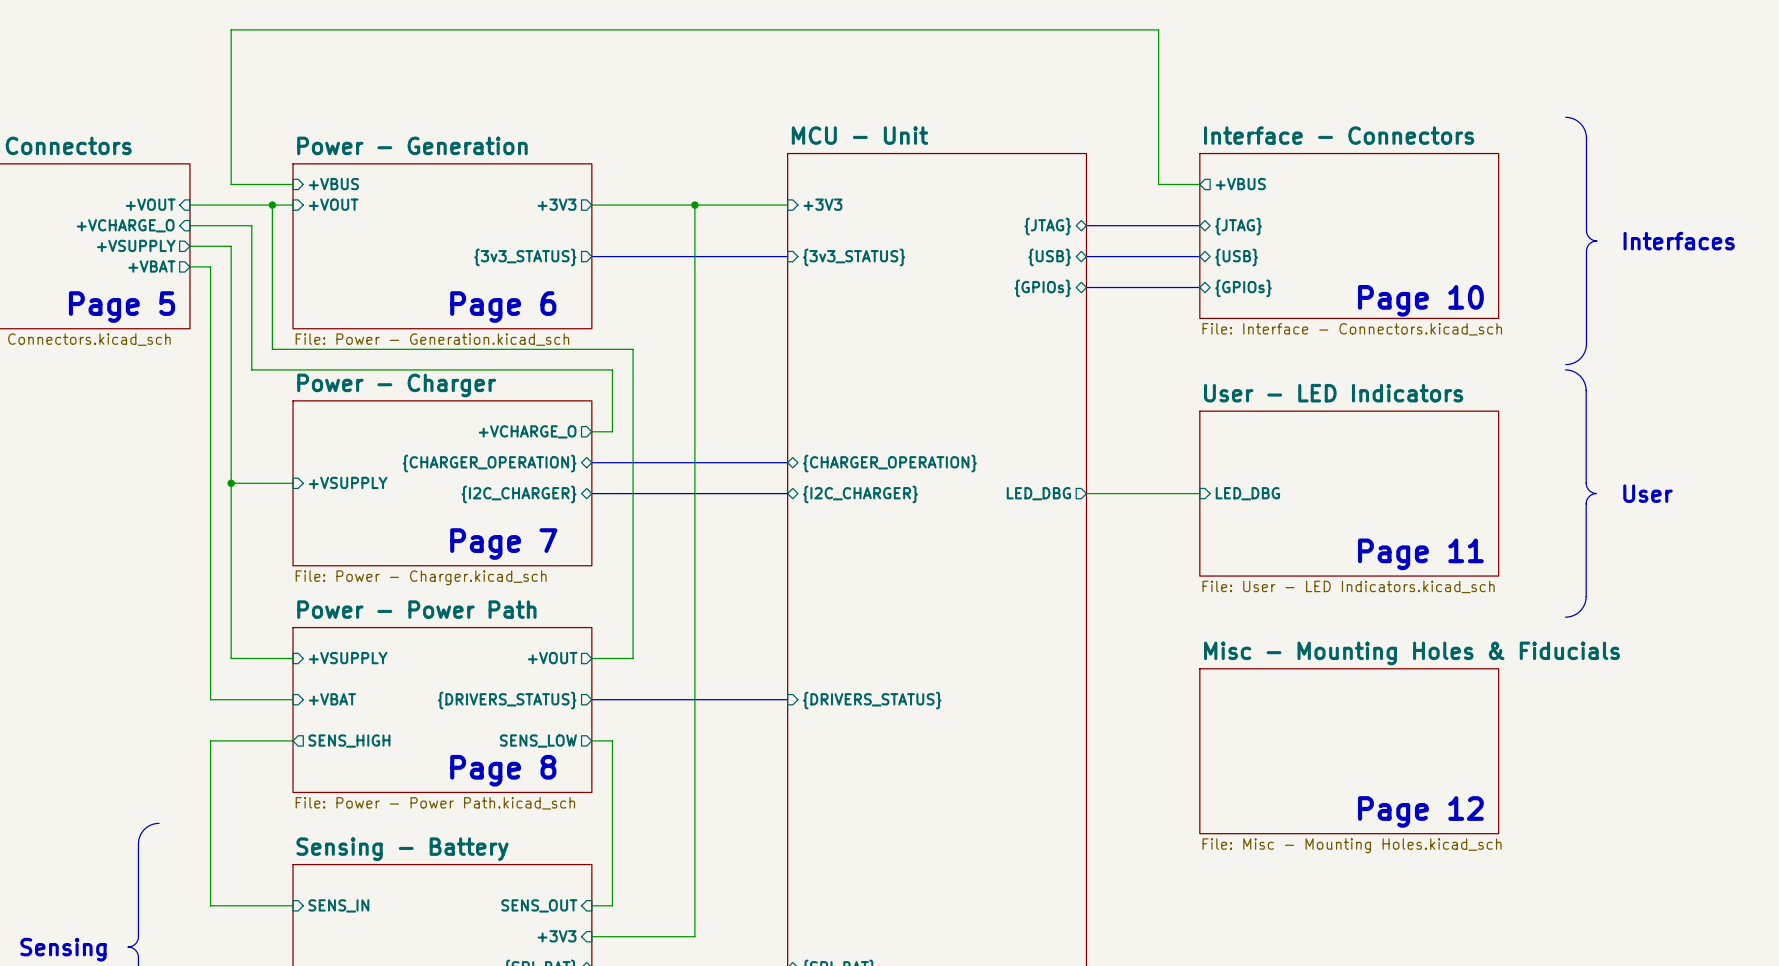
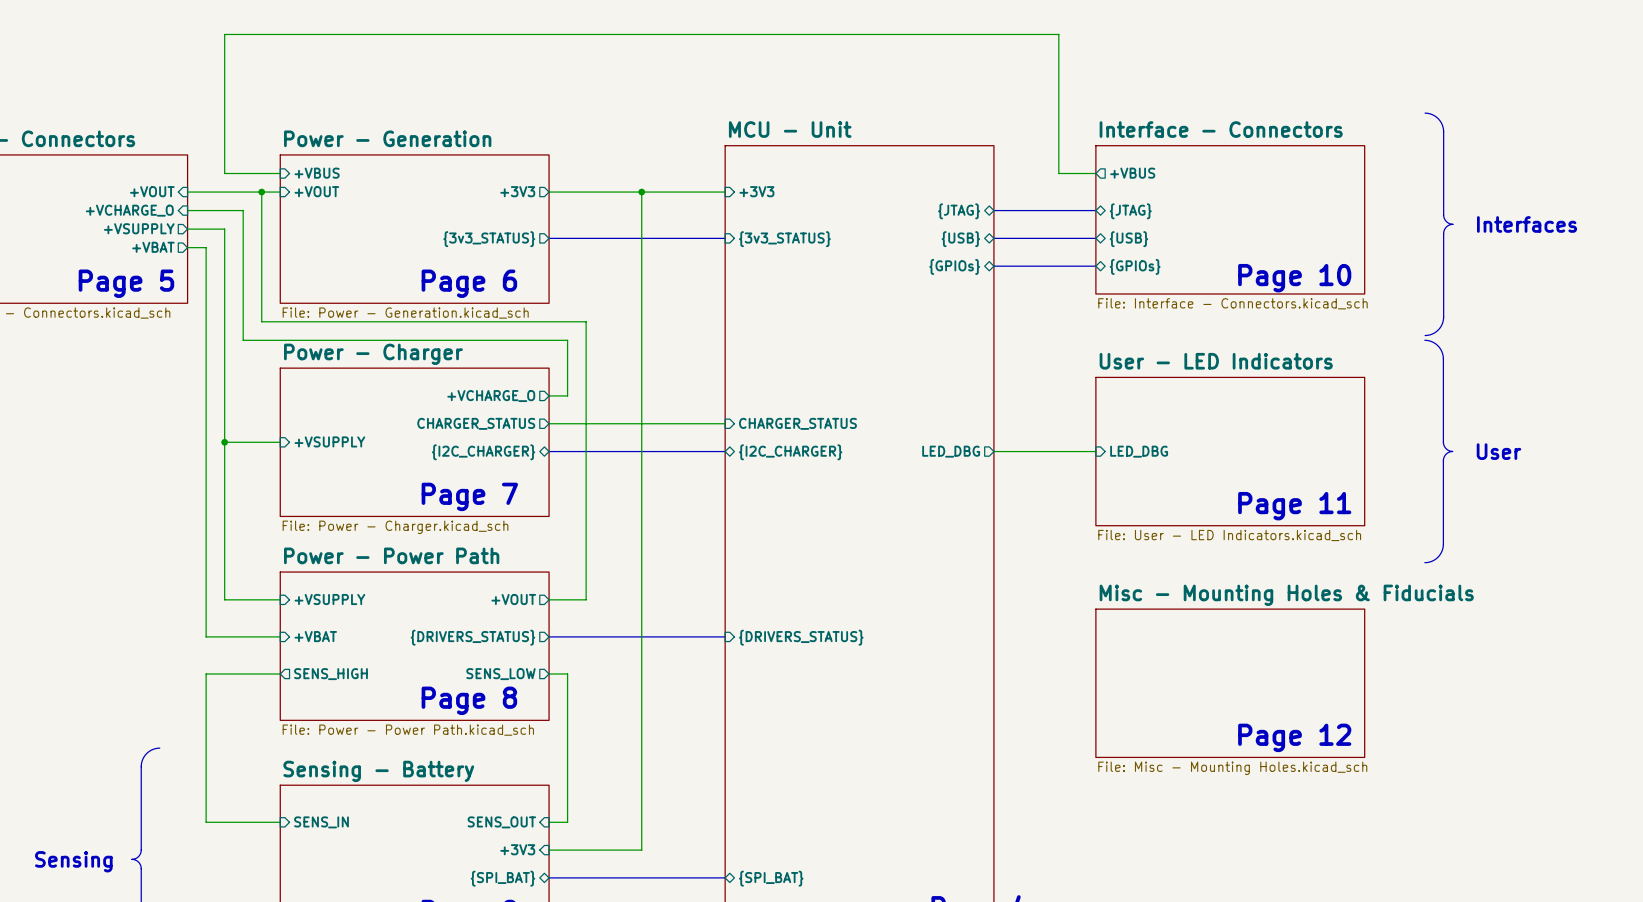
bus: (591, 462) (787, 462) -> none
sheet pin shape: bidirectional (489, 463) -> output (476, 423)
sheet pin: {CHARGER_OPERATION} (489, 463) -> CHARGER_STATUS (476, 423)
sheet pin shape: bidirectional (889, 463) -> input (797, 423)
sheet pin: {CHARGER_OPERATION} (889, 463) -> CHARGER_STATUS (797, 423)

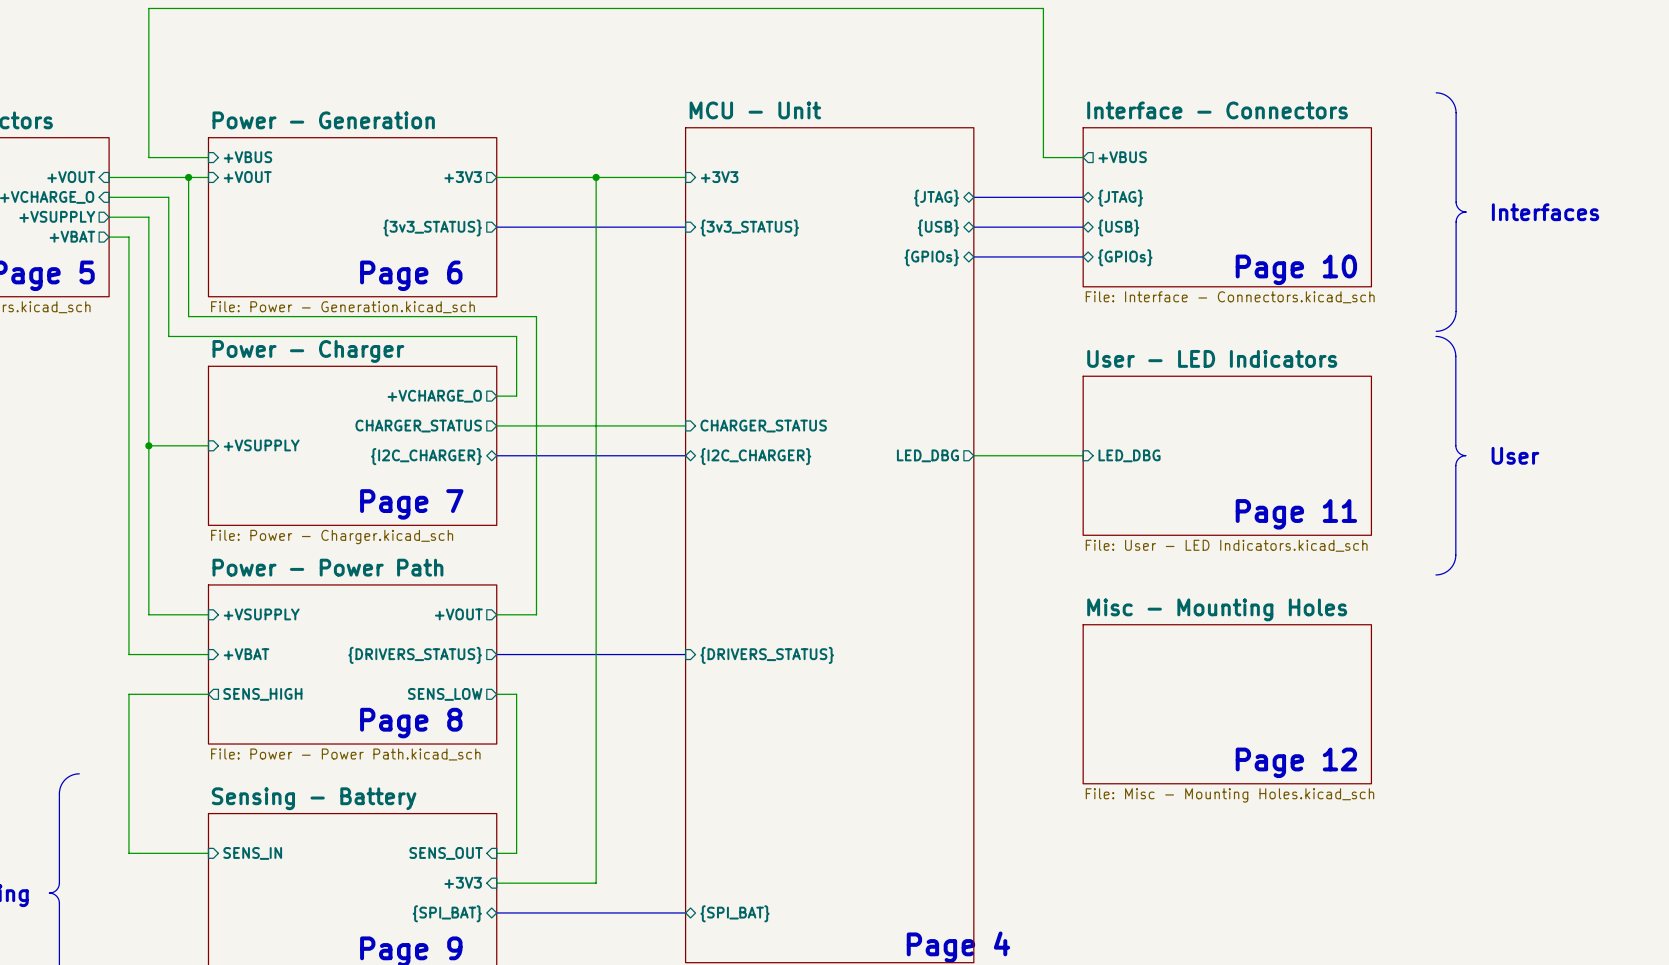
sheet Misc - Mounting Holes name: Misc - Mounting Holes & Fiducials (1286, 595) -> Misc - Mounting Holes (1217, 609)

